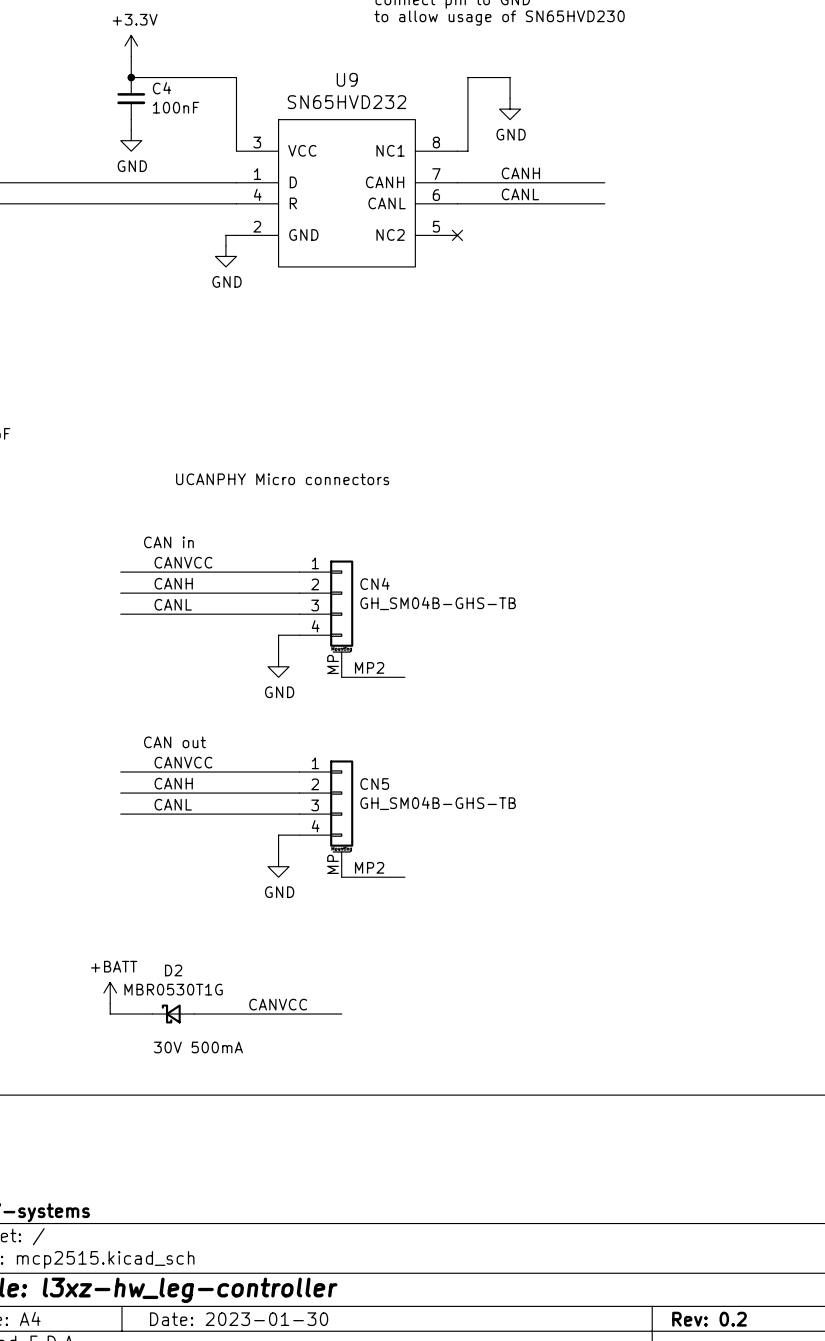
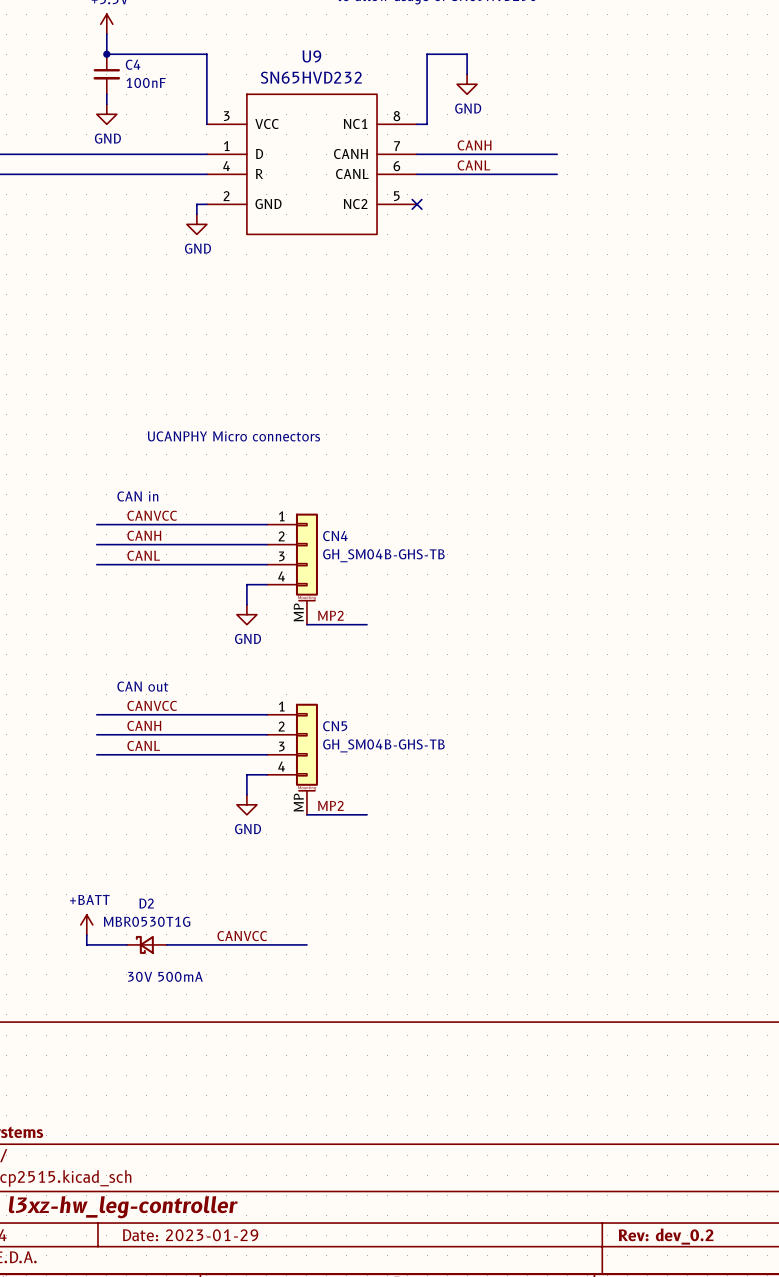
title block: Date: 2023-01-30 (239, 1319) -> Date: 2023-01-29 (190, 1235)
title block: Rev: 0.2 (709, 1319) -> Rev: dev_0.2 (666, 1236)

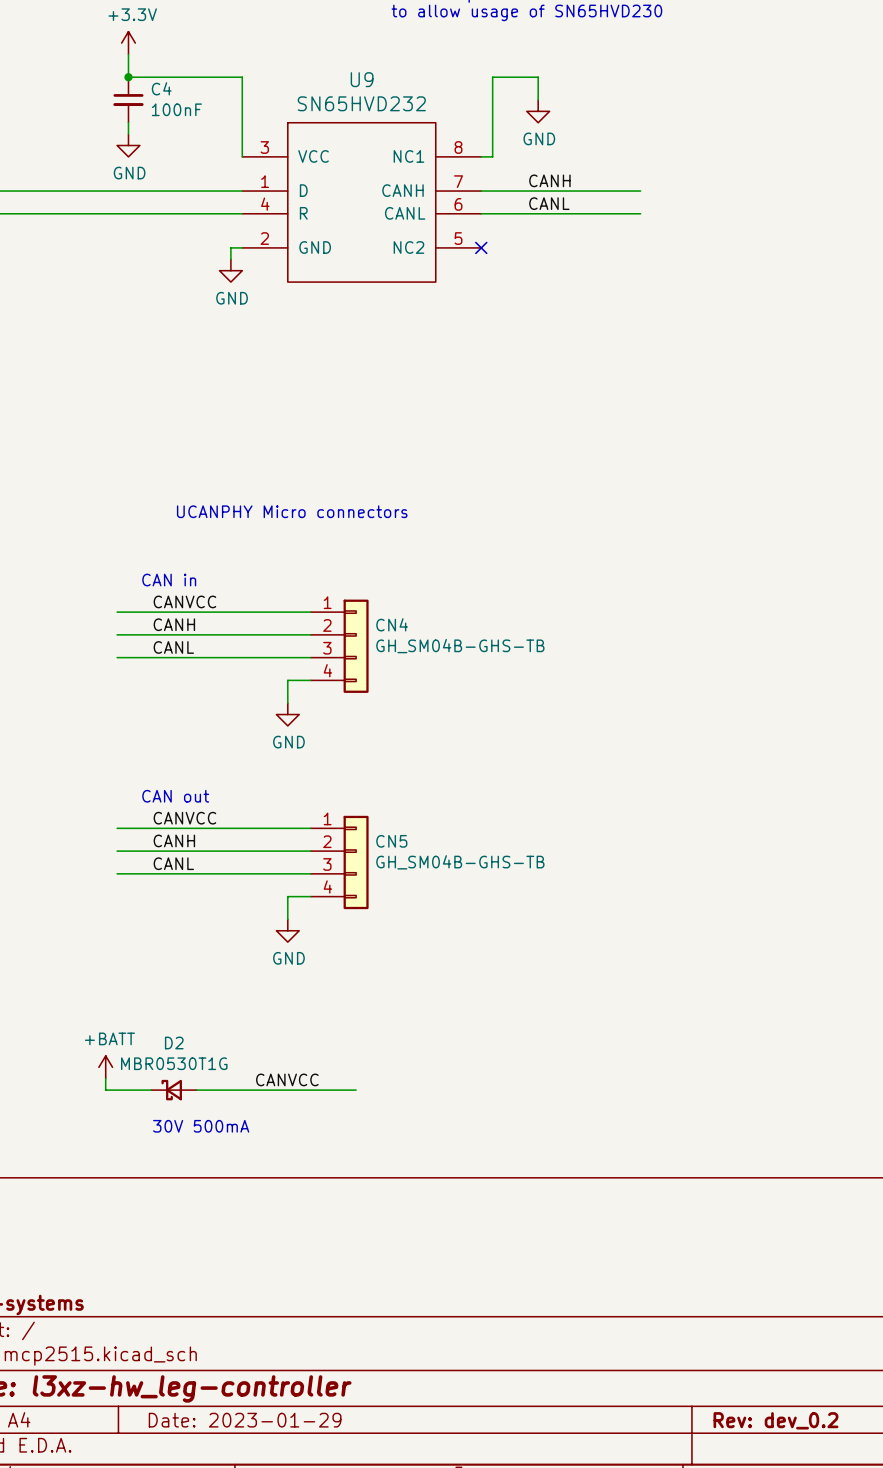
CN4 symbol: [266, 513, 318, 625] -> [310, 599, 369, 693]
label: MP2 (330, 615) -> none
wire: (306, 624) (367, 624) -> none
CN5 symbol: [266, 703, 318, 815] -> [310, 815, 369, 910]
label: MP2 (330, 805) -> none
wire: (306, 814) (367, 814) -> none

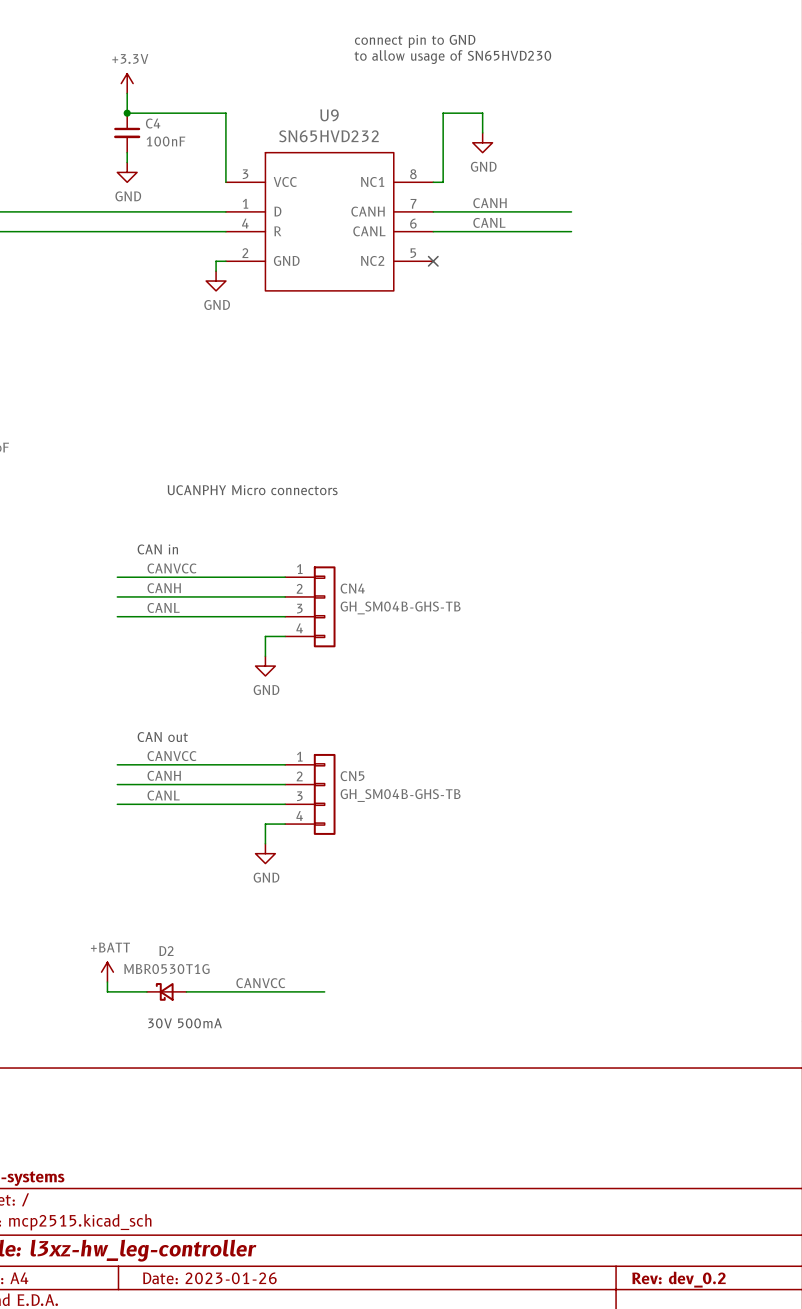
title block: Date: 2023-01-29 (245, 1420) -> Date: 2023-01-26 (209, 1278)

